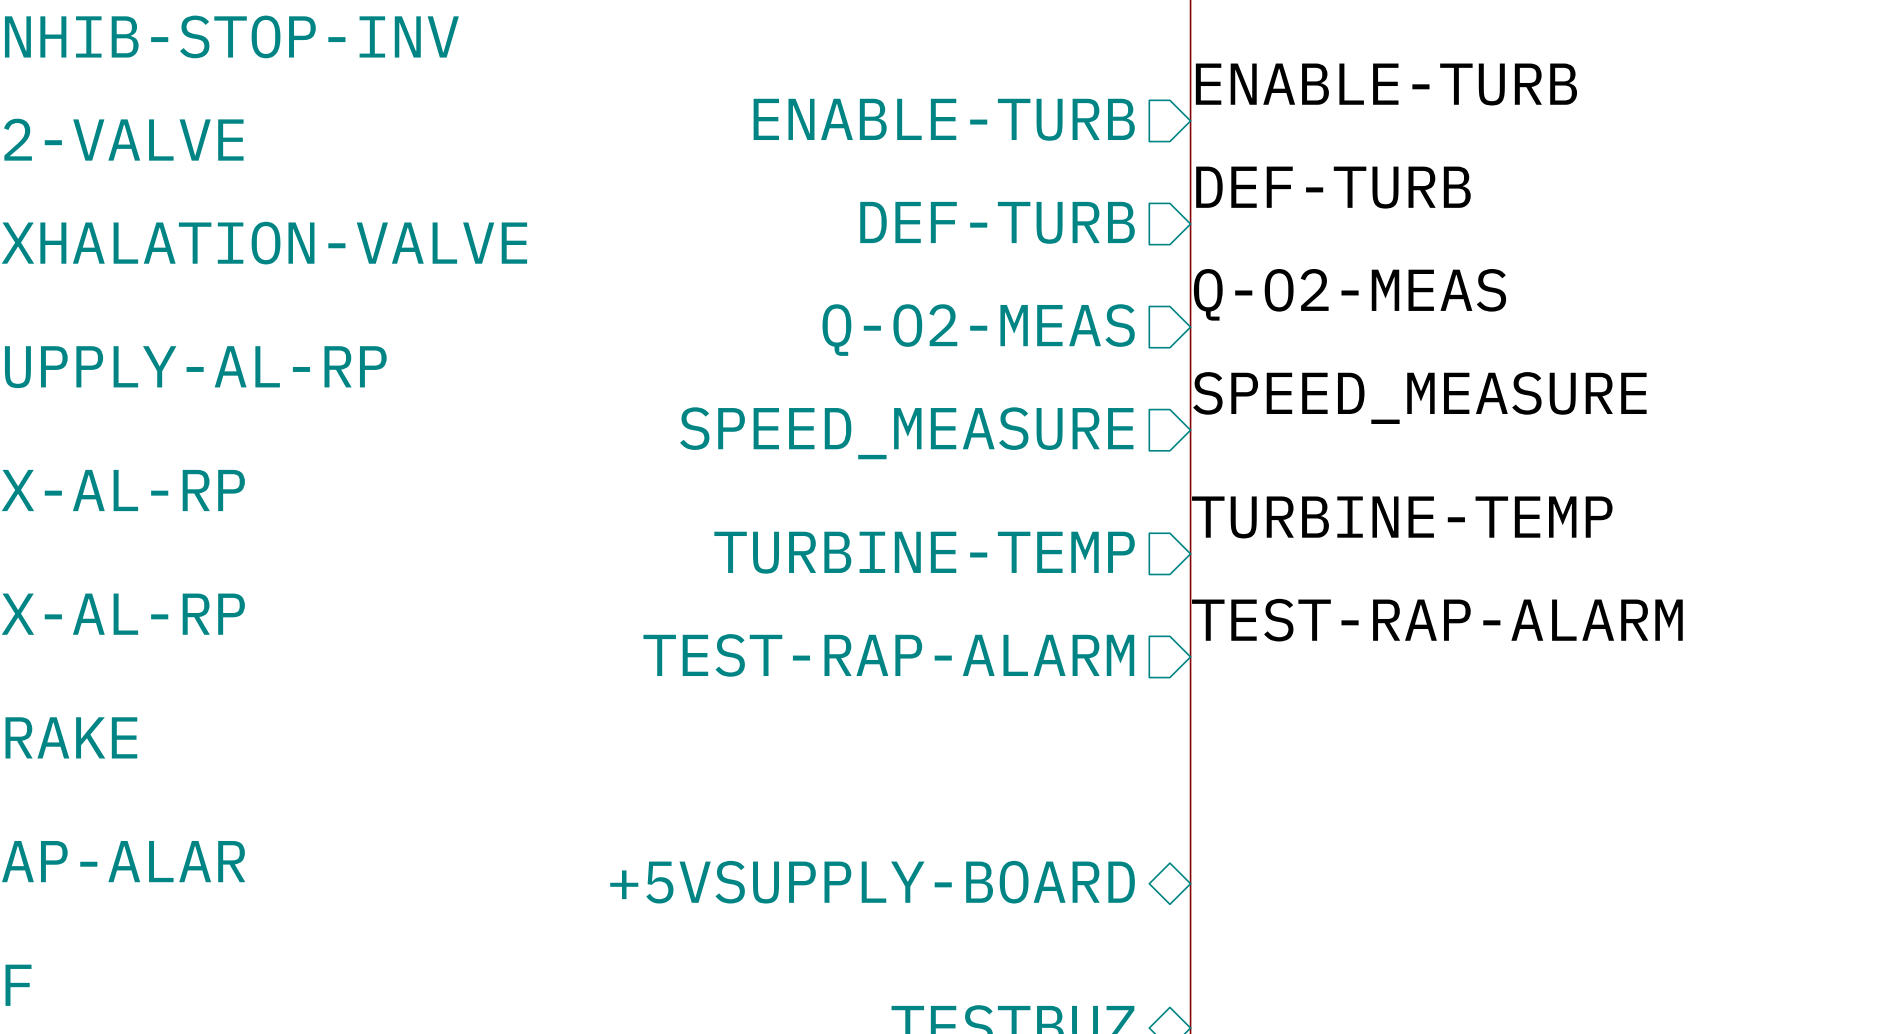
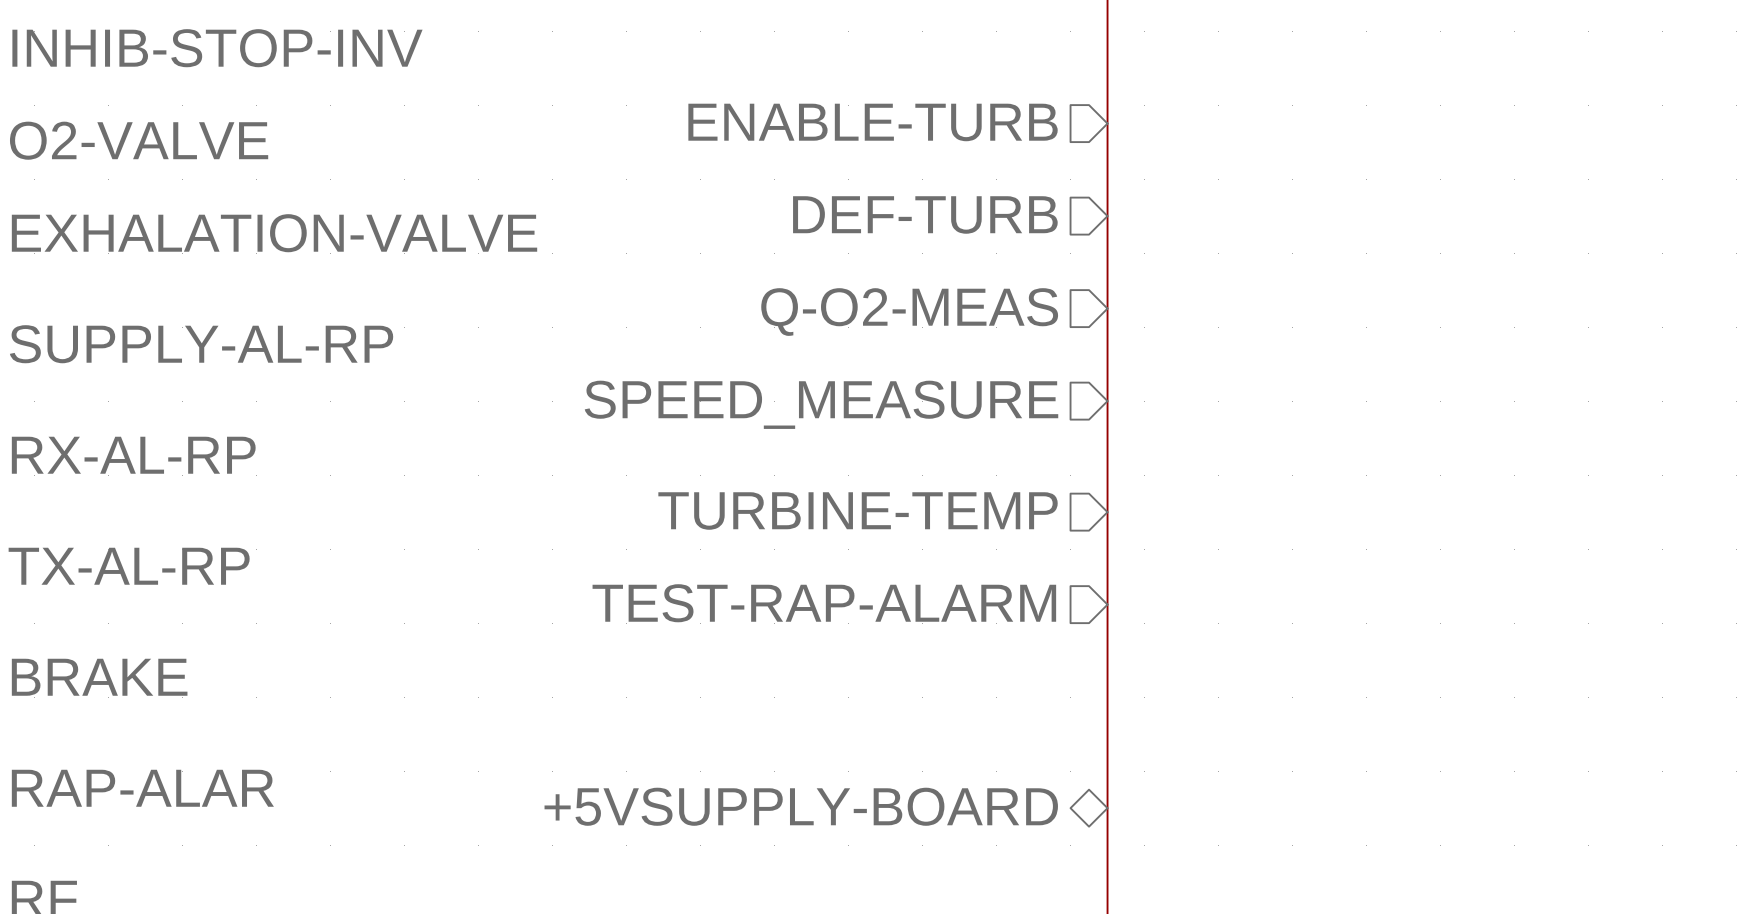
label: ENABLE-TURB (1386, 84) -> none
label: DEF-TURB (1333, 187) -> none
label: Q-O2-MEAS (1349, 294) -> none
label: SPEED_MEASURE (1419, 398) -> none
label: TURBINE-TEMP (1402, 517) -> none
label: TEST-RAP-ALARM (1437, 620) -> none

